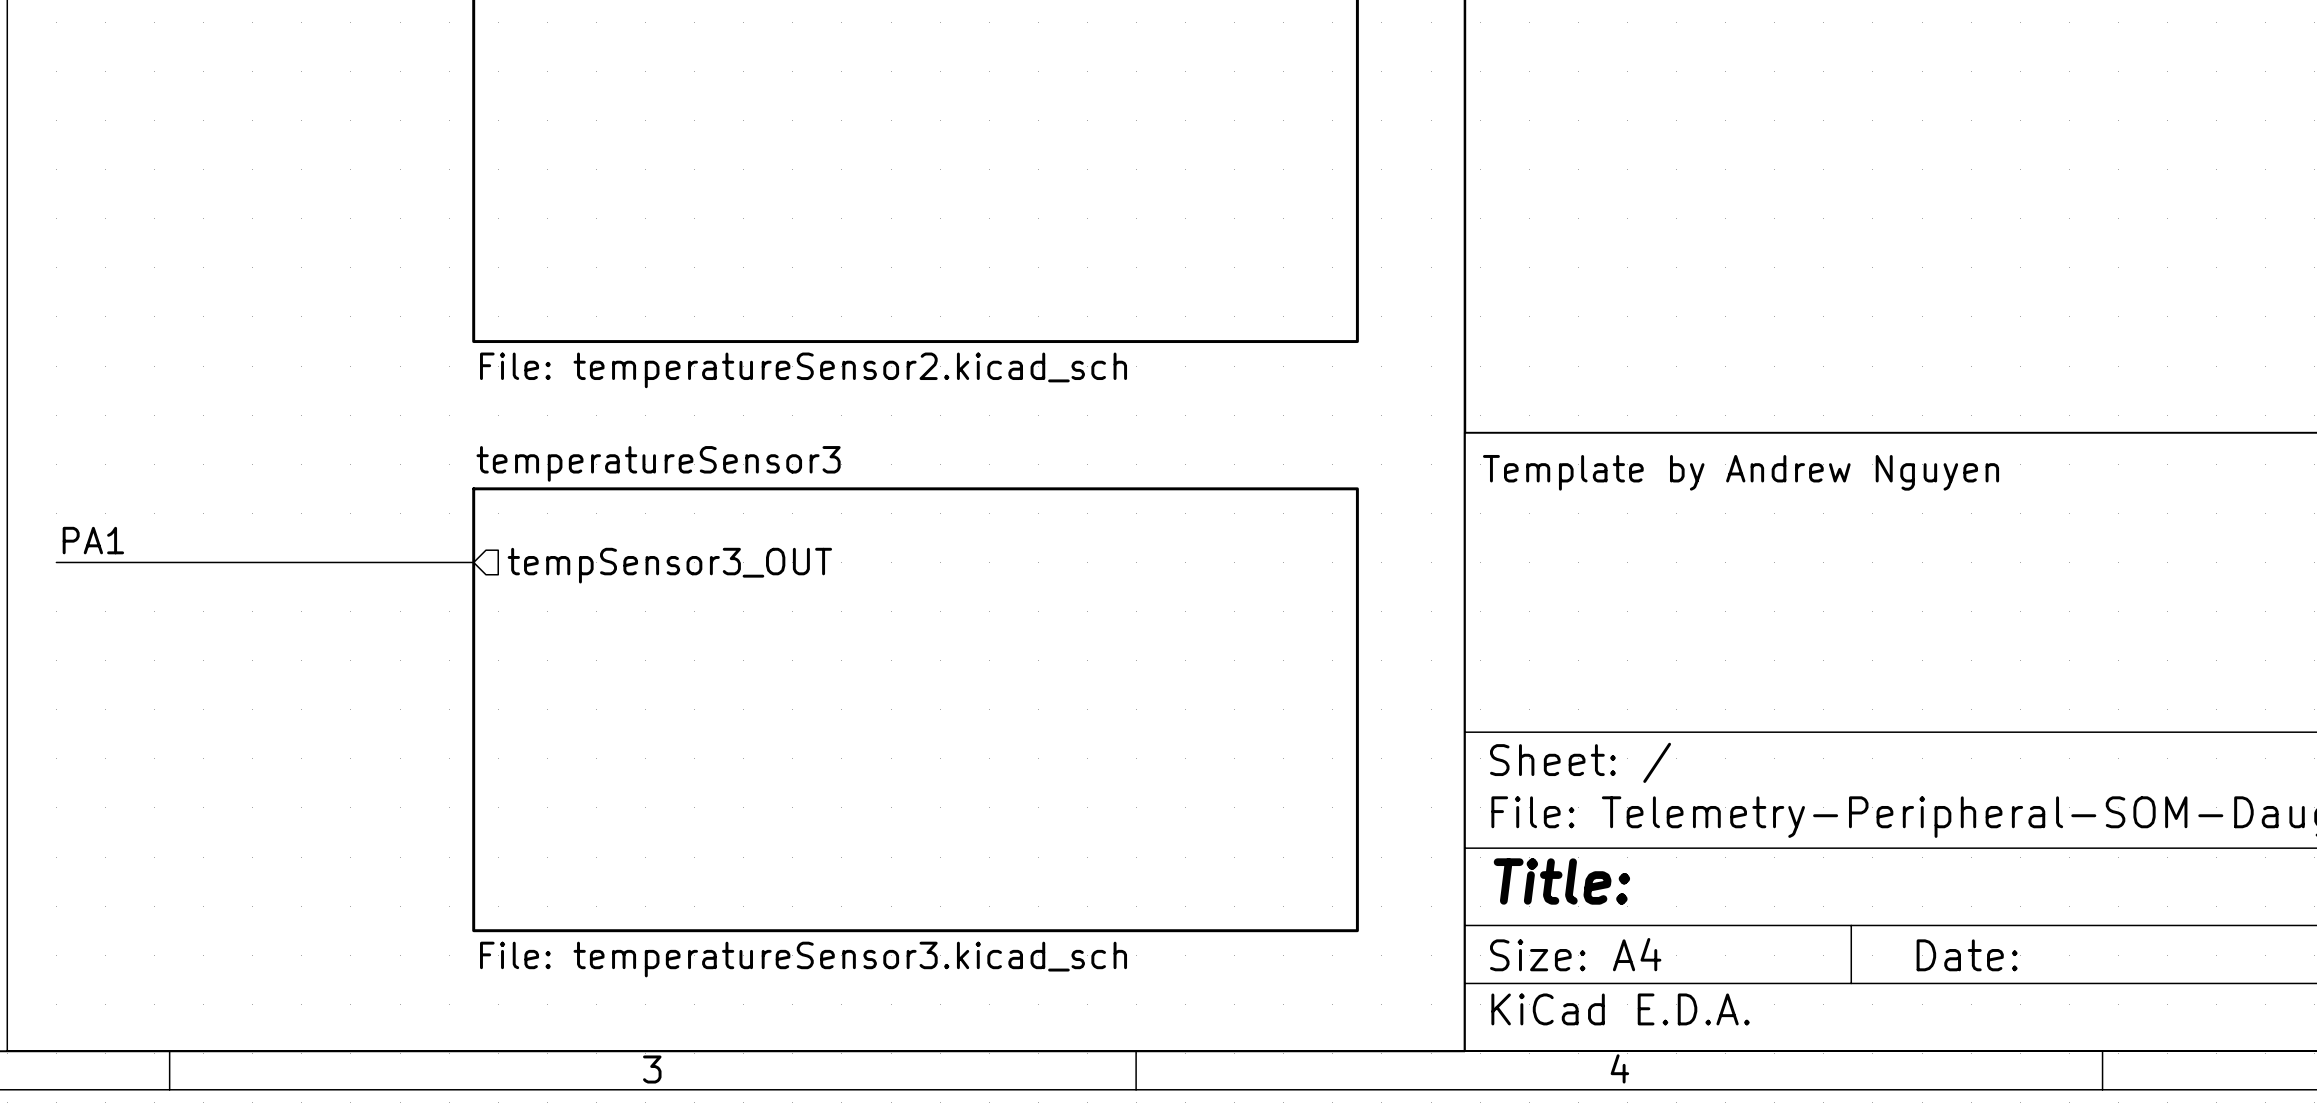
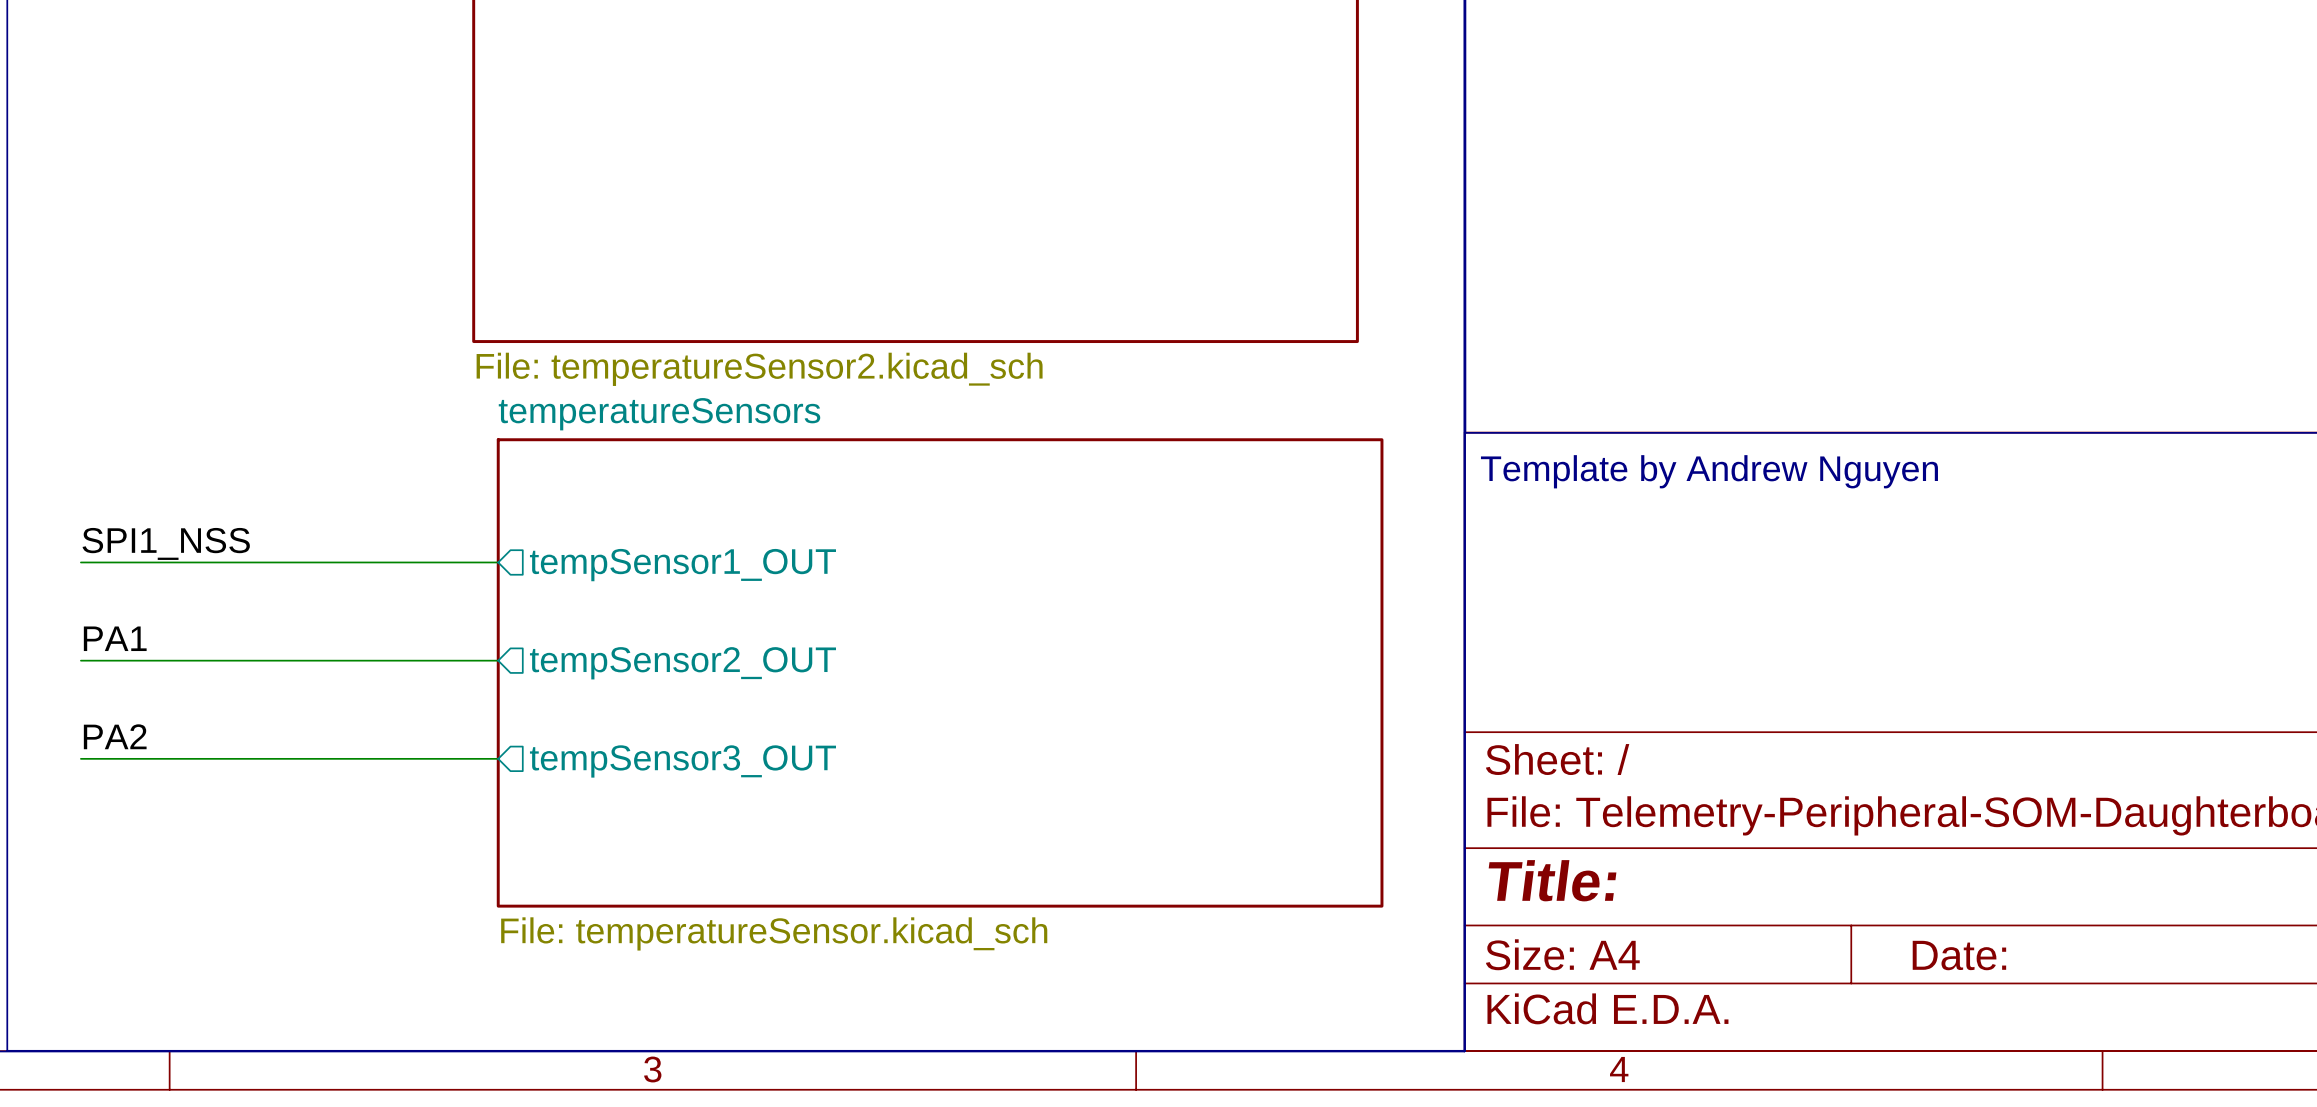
label position: PA1 (93, 540) -> PA1 (115, 638)
label: none -> SPI1_NSS (166, 543)
wire: (56, 562) (80, 562) -> (473, 562) (498, 562)
sheet pin position: tempSensor3_OUT (669, 565) -> tempSensor3_OUT (682, 761)
sheet pin: none -> tempSensor1_OUT (682, 565)
wire: none -> (80, 660) (498, 660)
sheet pin: none -> tempSensor2_OUT (682, 663)
sheet temperatureSensors: none -> File: temperatureSensor.kicad_sch (940, 672)
sheet temperatureSensor3: File: temperatureSensor3.kicad_sch (915, 709) -> none
label: none -> PA2 (115, 736)
wire: none -> (80, 758) (498, 758)

